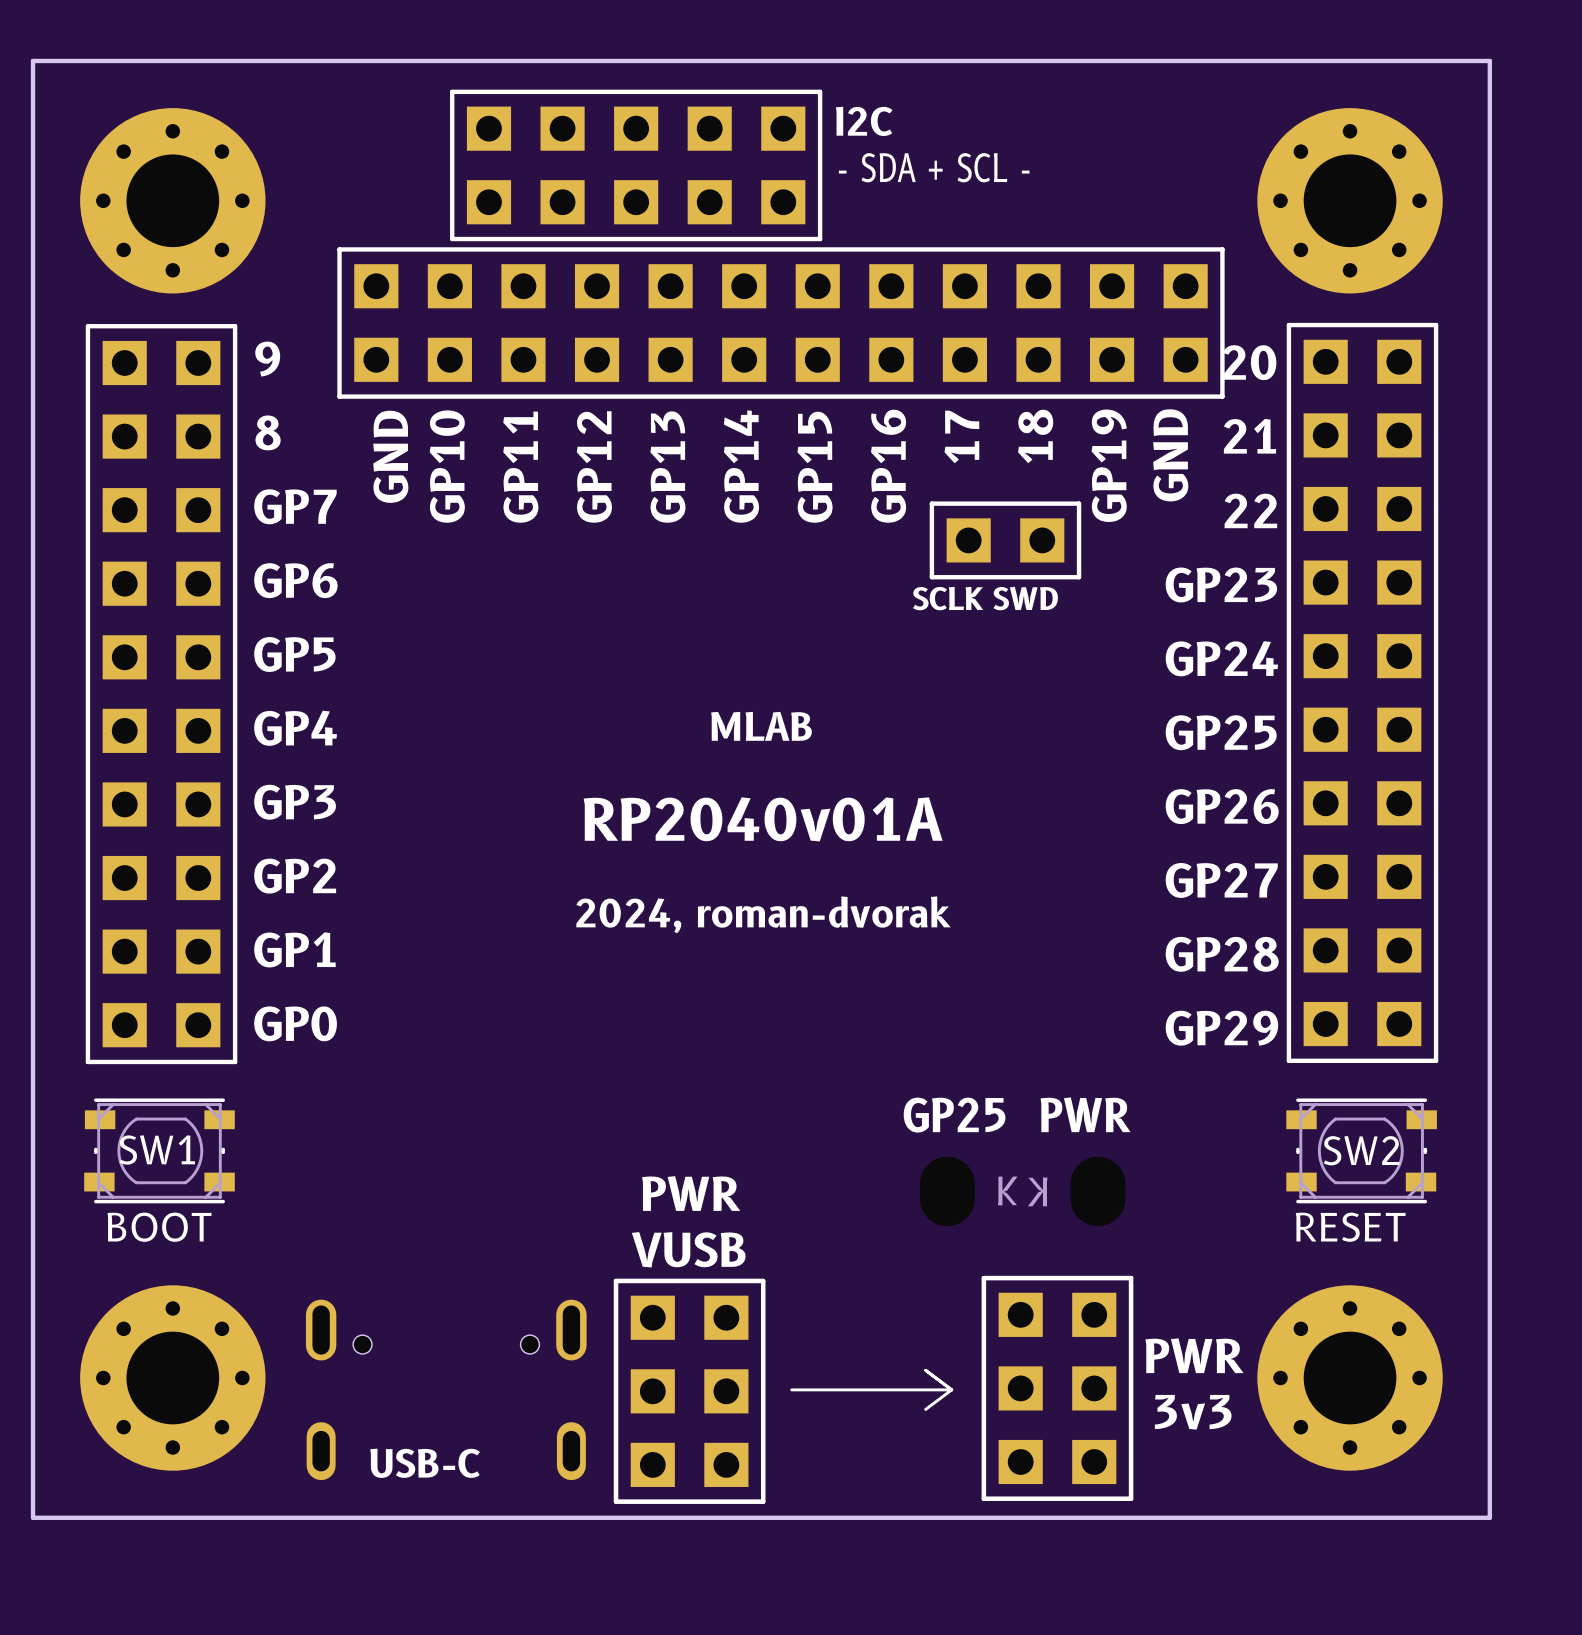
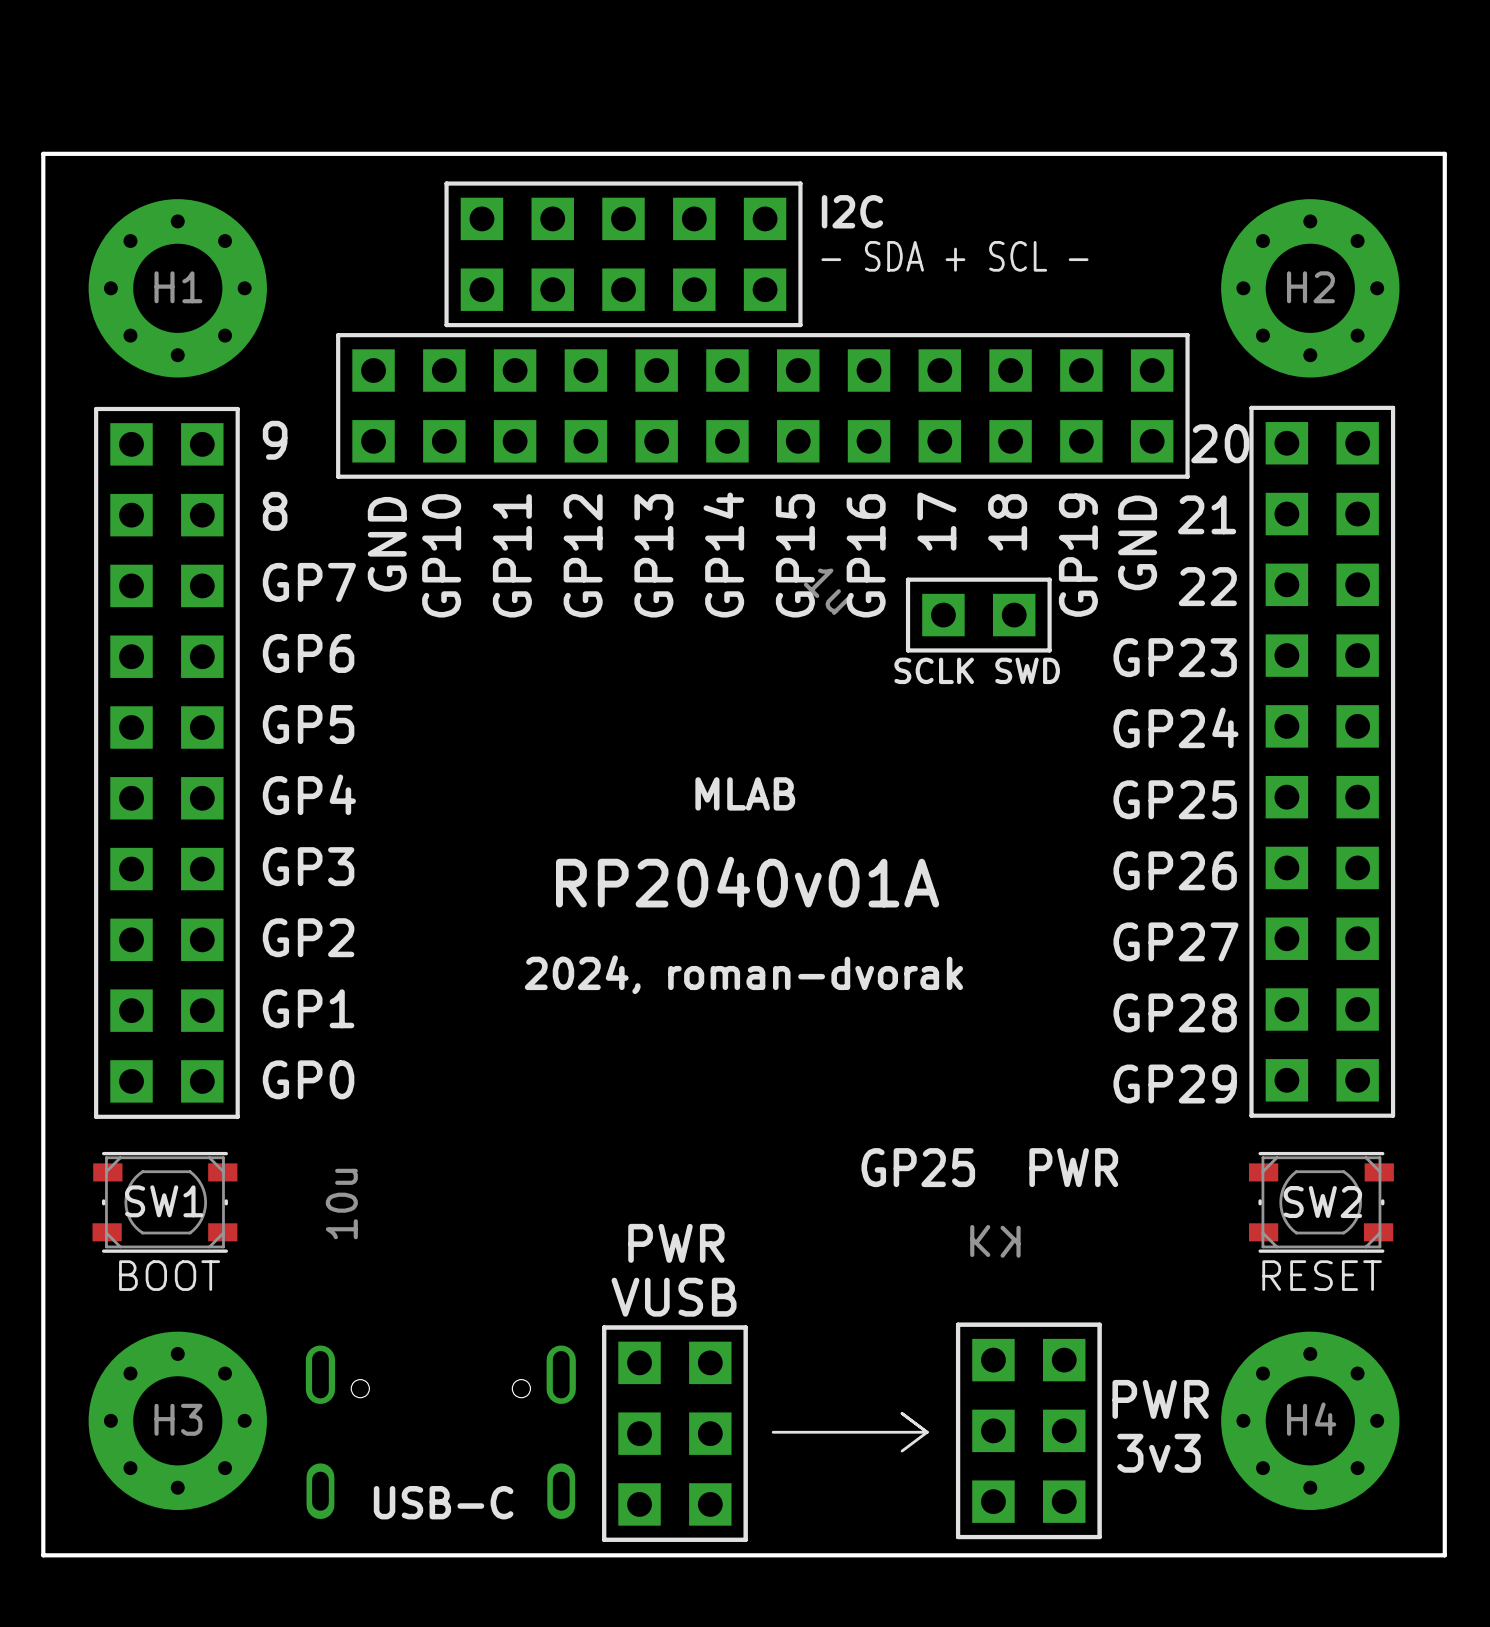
H1 name: none -> H1 (178, 287)
H2 name: none -> H2 (1310, 287)
part: none -> 1u (826, 591)
part: none -> 10u (341, 1204)
H3 name: none -> H3 (178, 1419)
H4 name: none -> H4 (1311, 1419)

